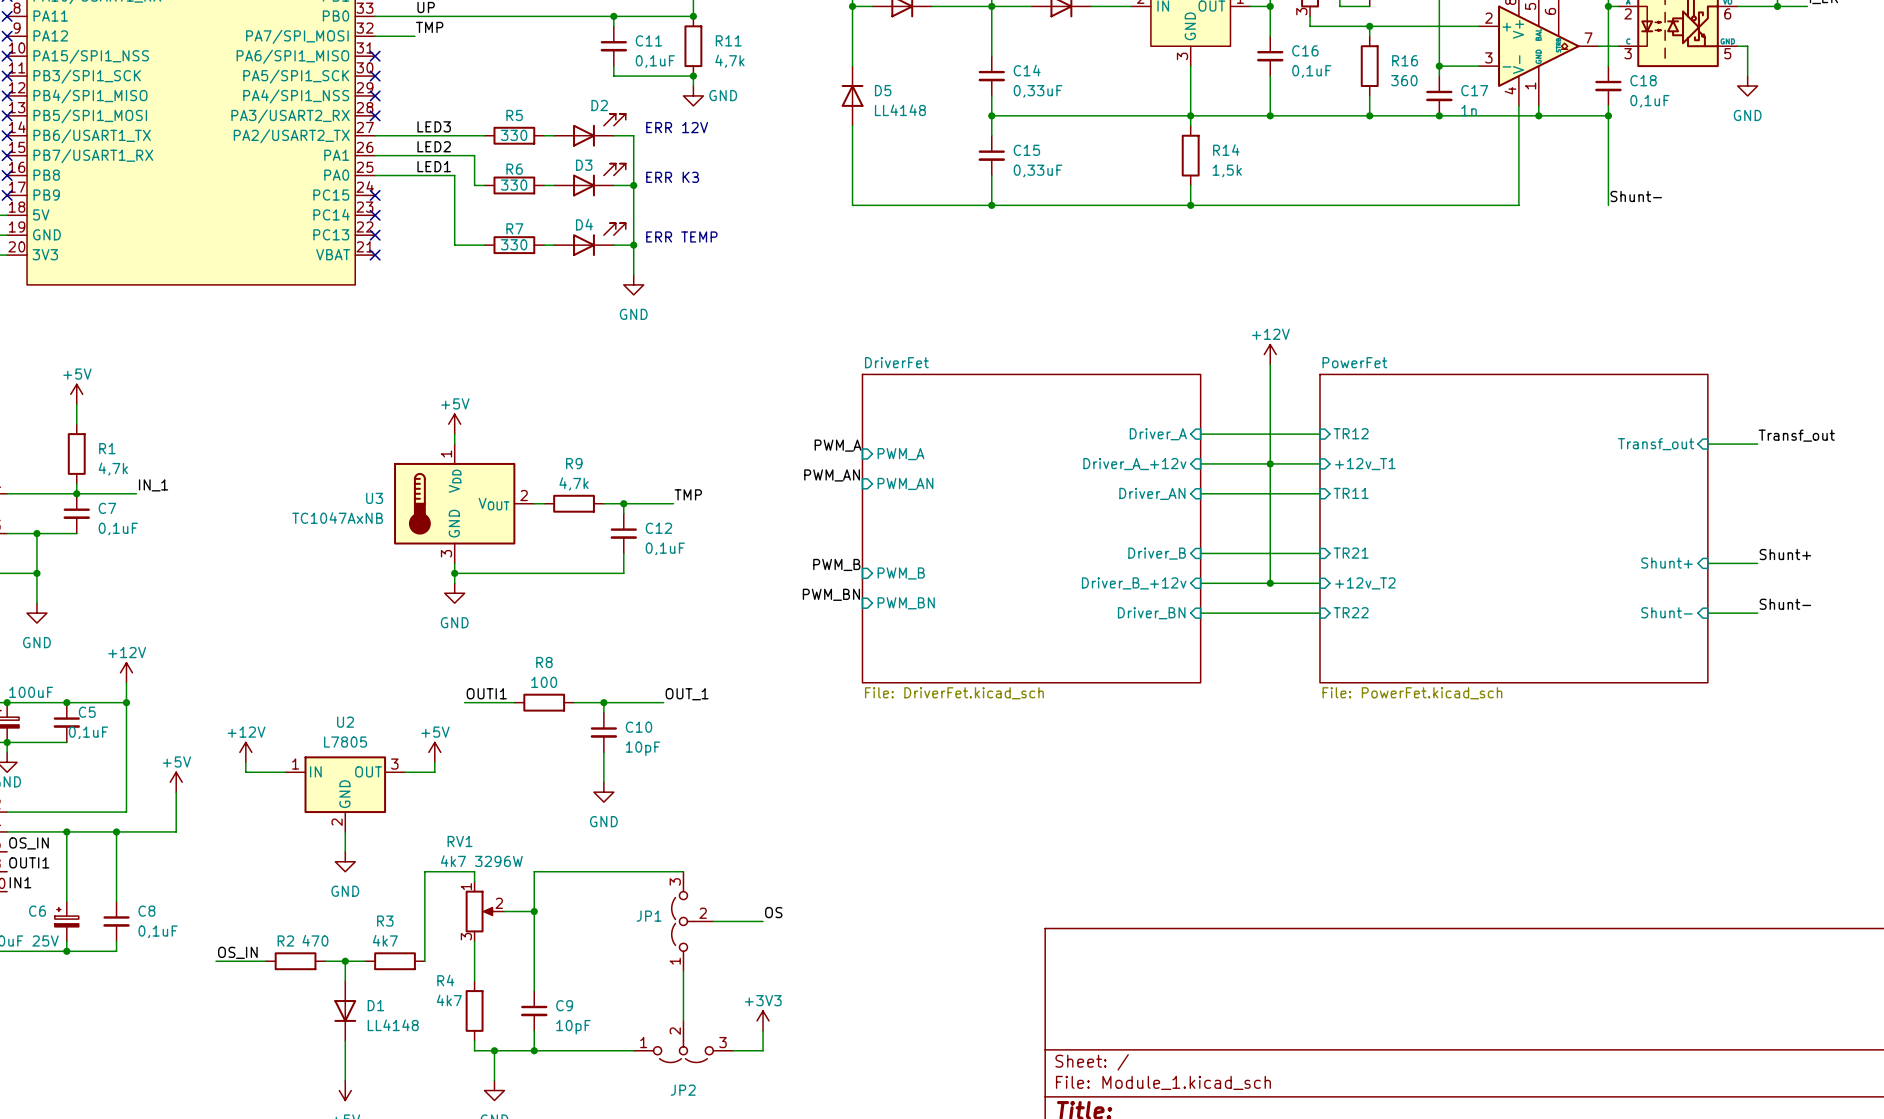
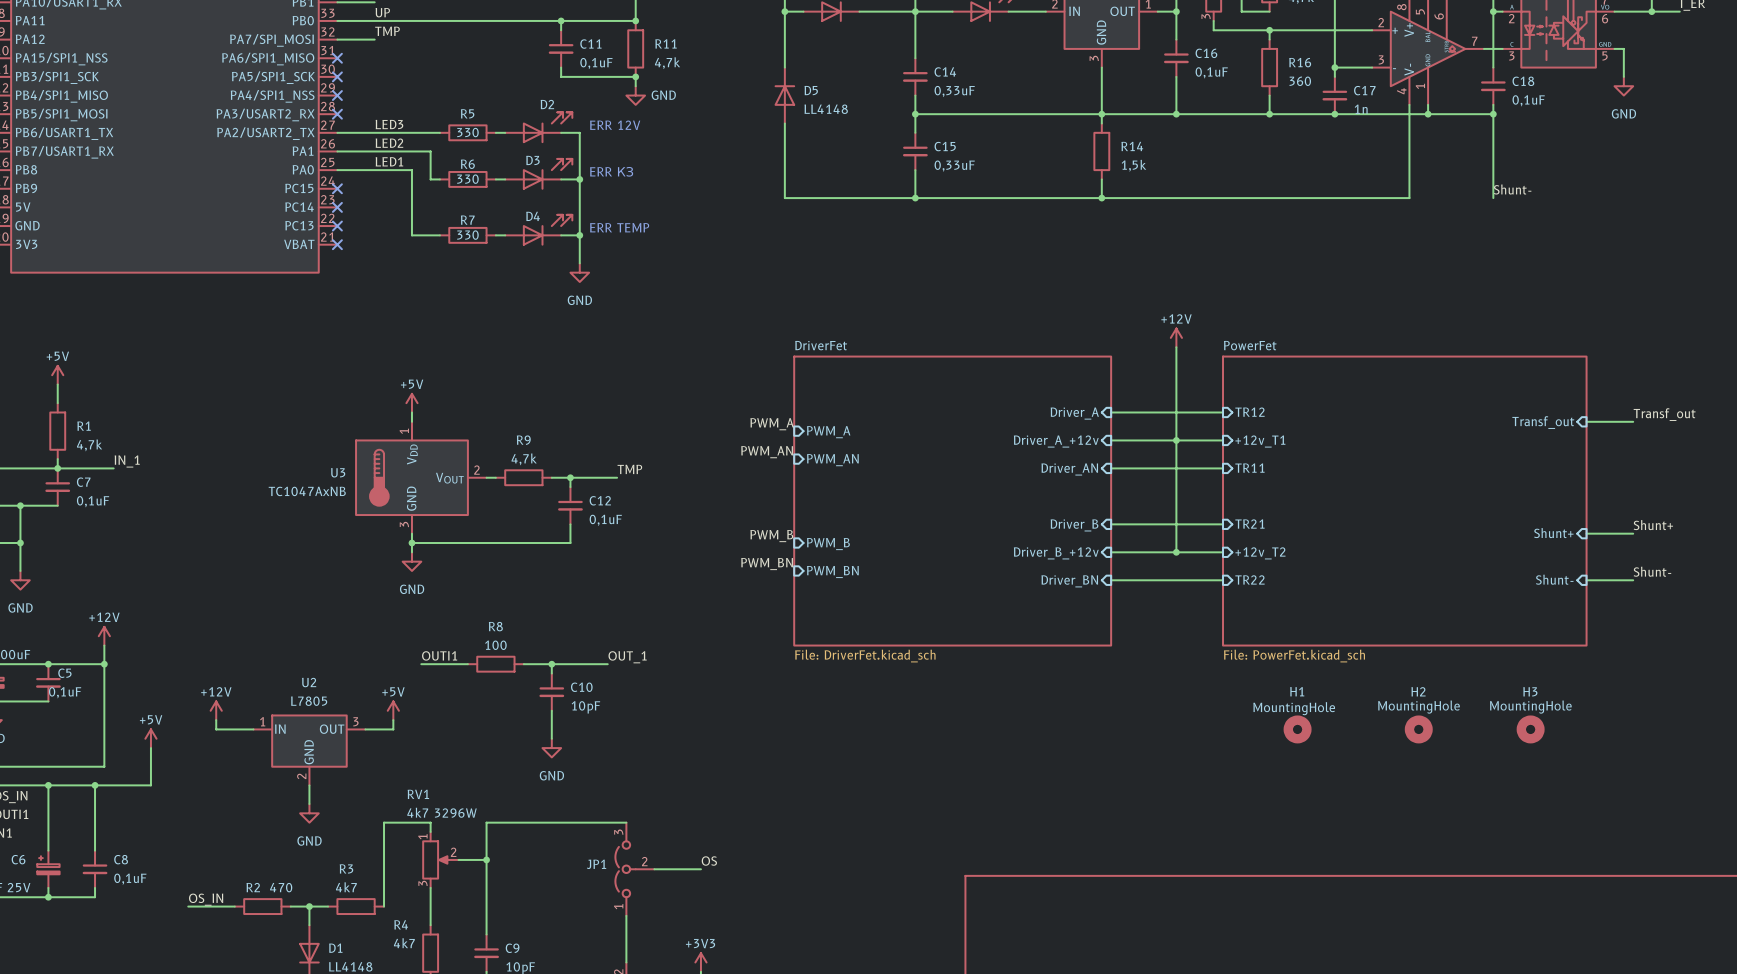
H1: none -> MountingHole (1297, 729)
H2: none -> MountingHole (1418, 729)
H3: none -> MountingHole (1530, 729)

